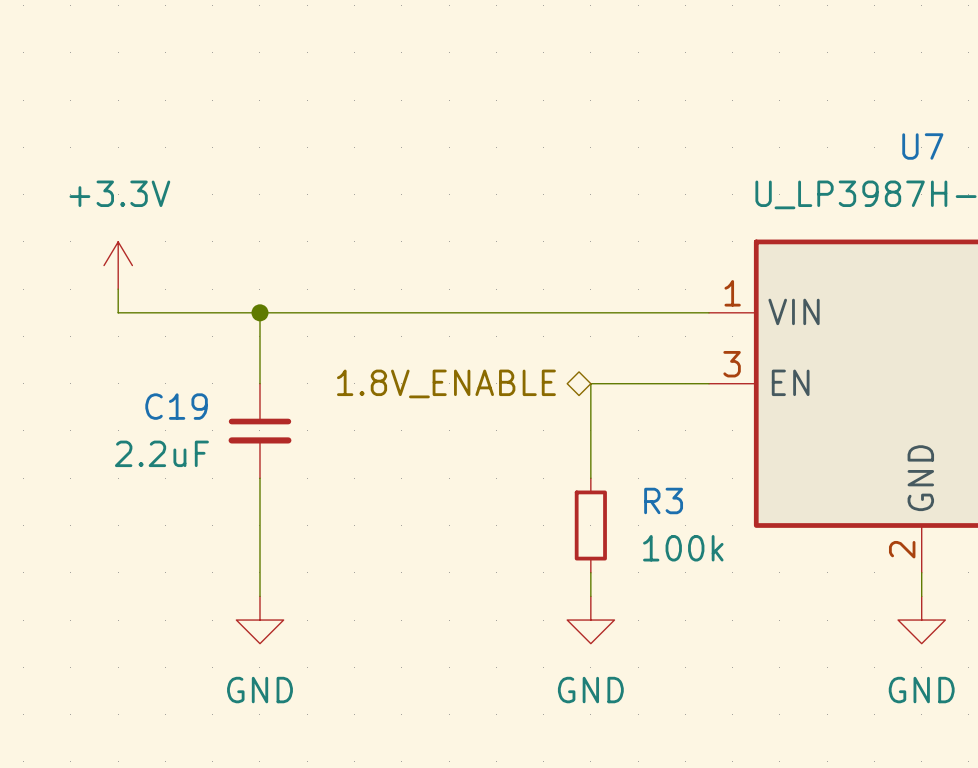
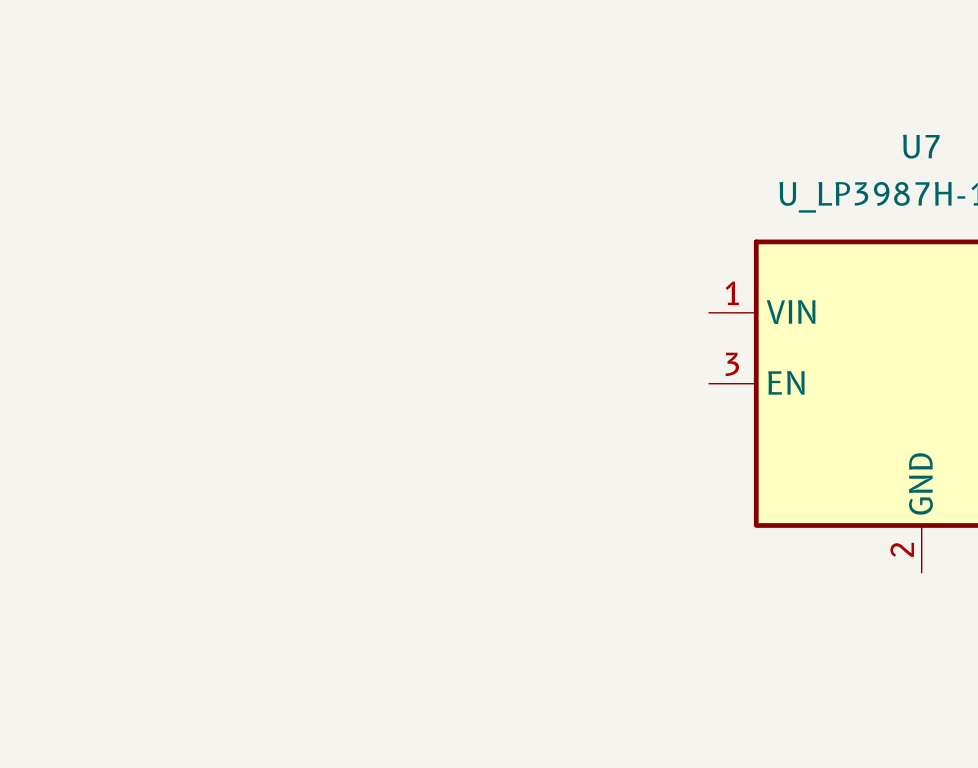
power symbol: +3.3V (118, 265) -> none
wire: (118, 289) (118, 312) (709, 312) -> none
wire: (259, 312) (259, 383) -> none
junction: (259, 312) -> none
hierarchical label: 1.8V_ENABLE (446, 383) -> none
wire: (709, 383) (590, 383) (590, 478) -> none
C19: (259, 430) -> none
wire: (259, 478) (259, 596) -> none
R3: (590, 525) -> none
wire: (590, 572) (590, 596) -> none
wire: (921, 572) (921, 596) -> none
power symbol: GND (259, 620) -> none
power symbol: GND (590, 620) -> none
power symbol: GND (921, 620) -> none

